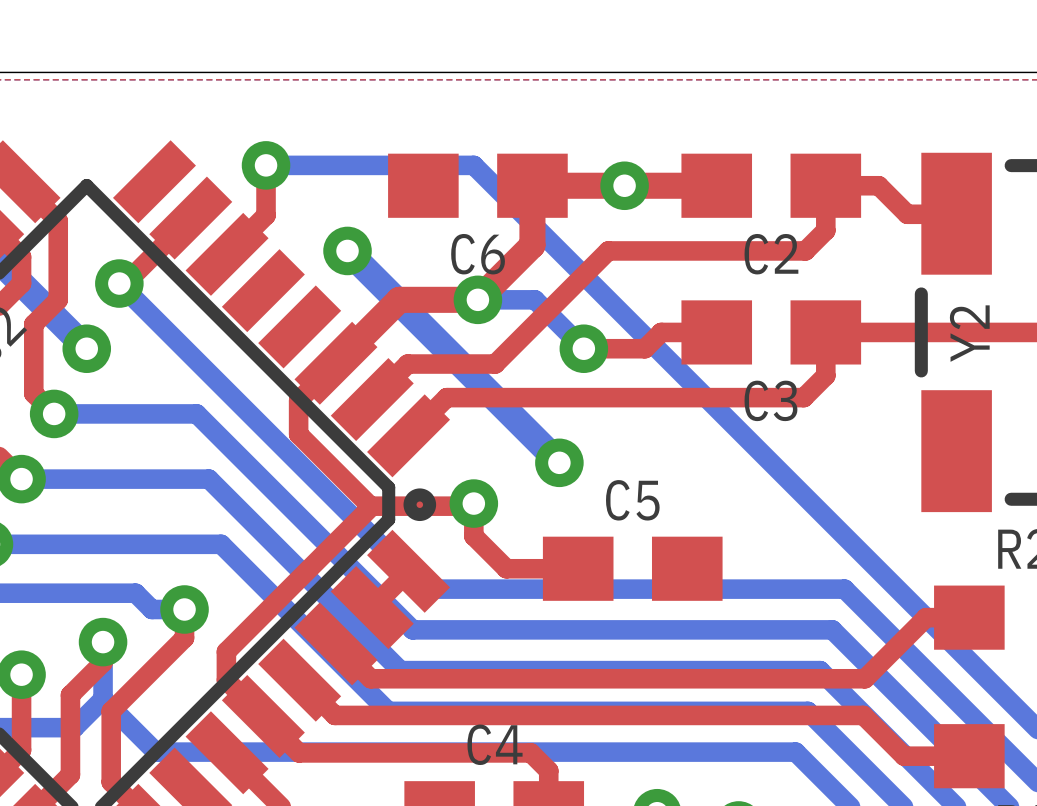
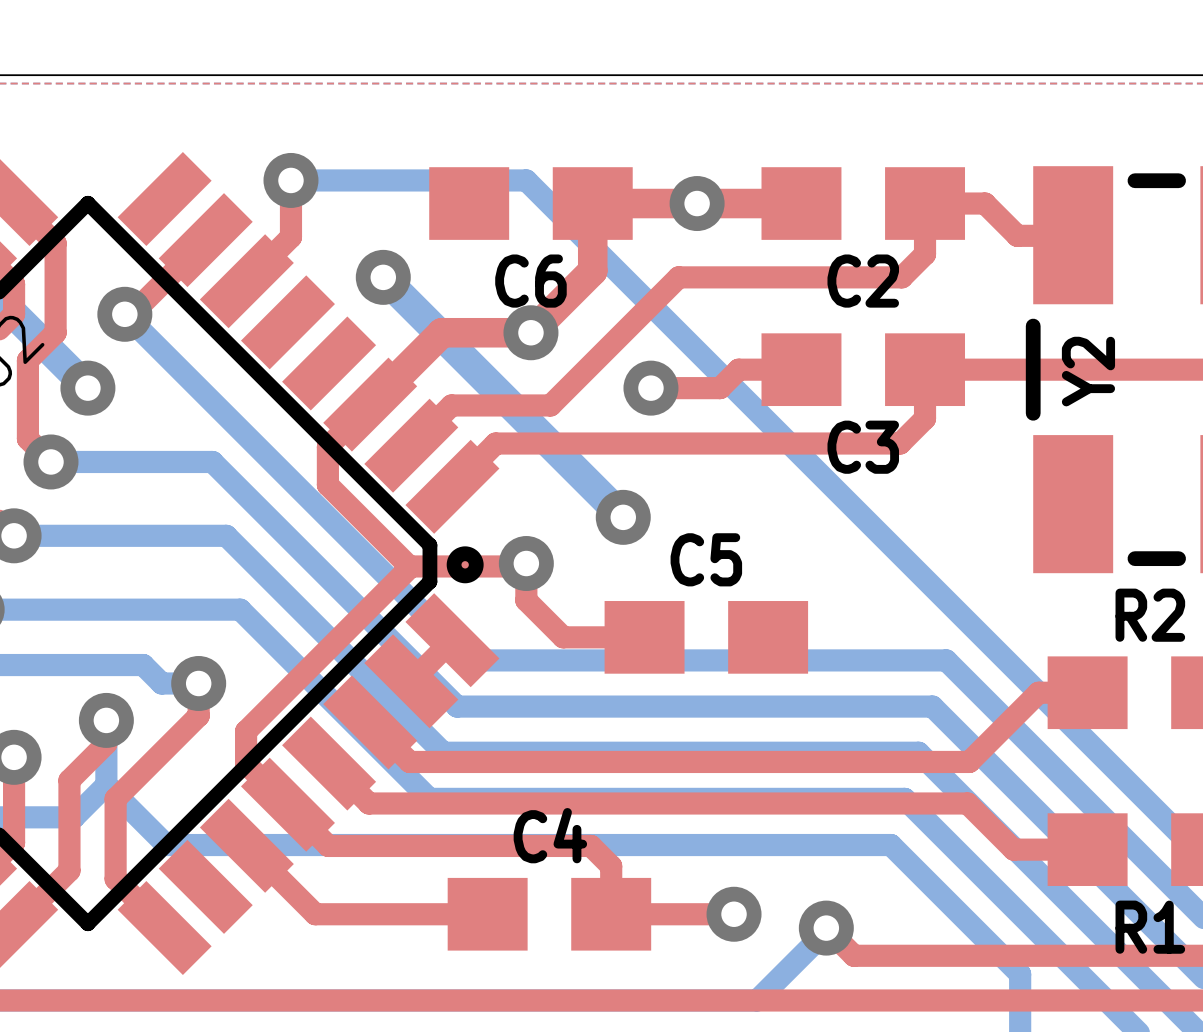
bottom track: (477, 299) (534, 299) (583, 348) -> none

